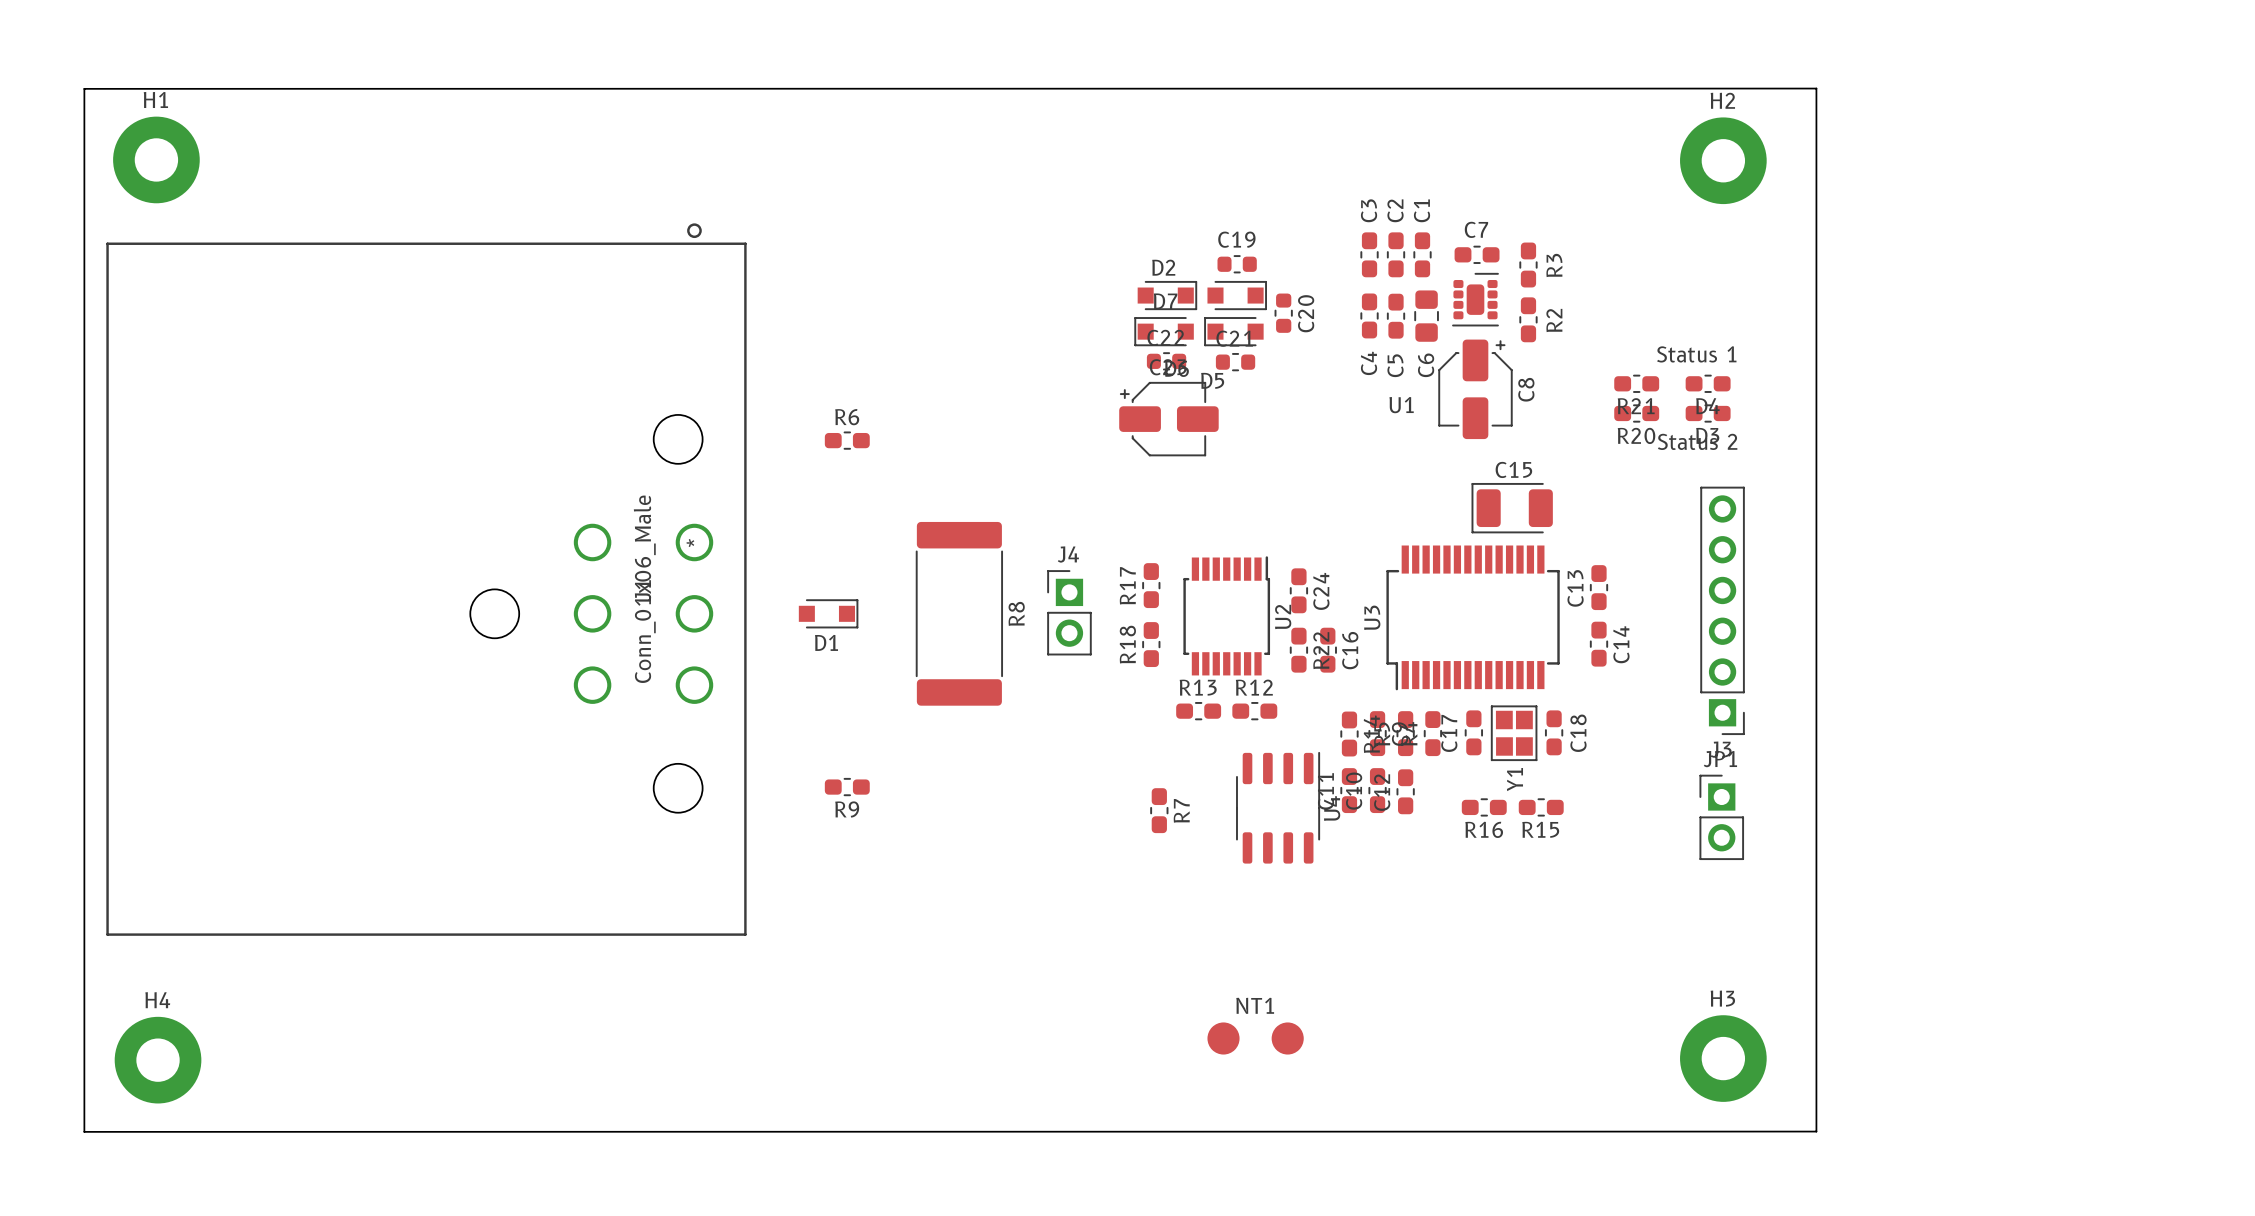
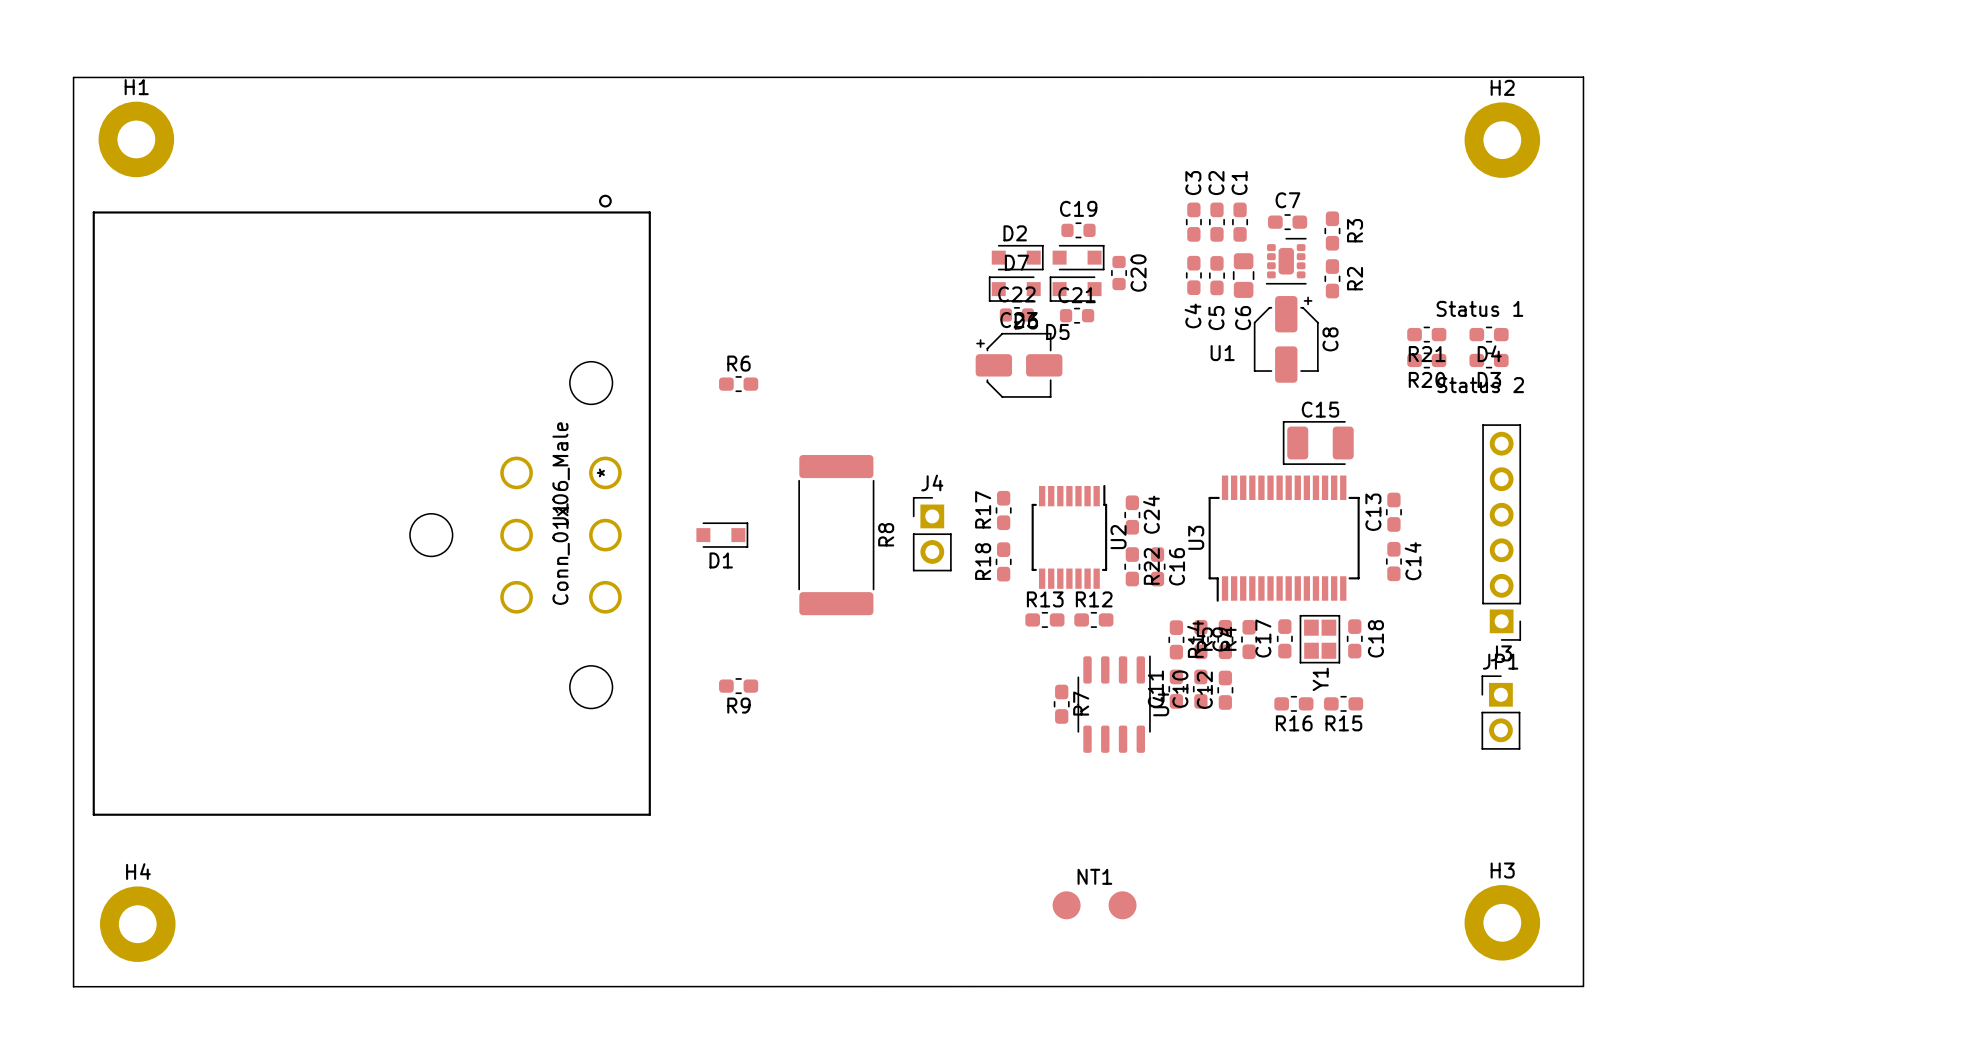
R7 position: (1159, 810) -> (1061, 704)

